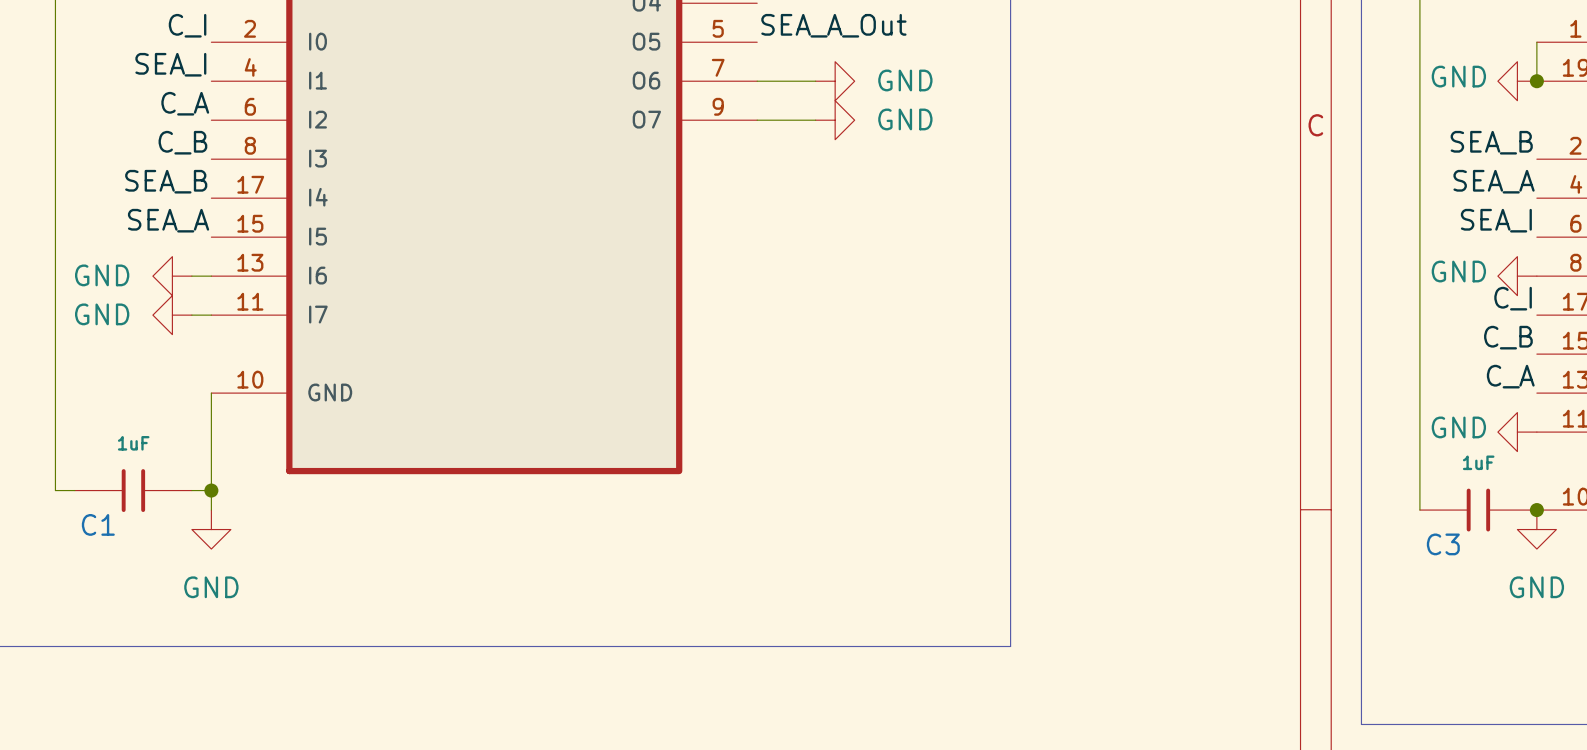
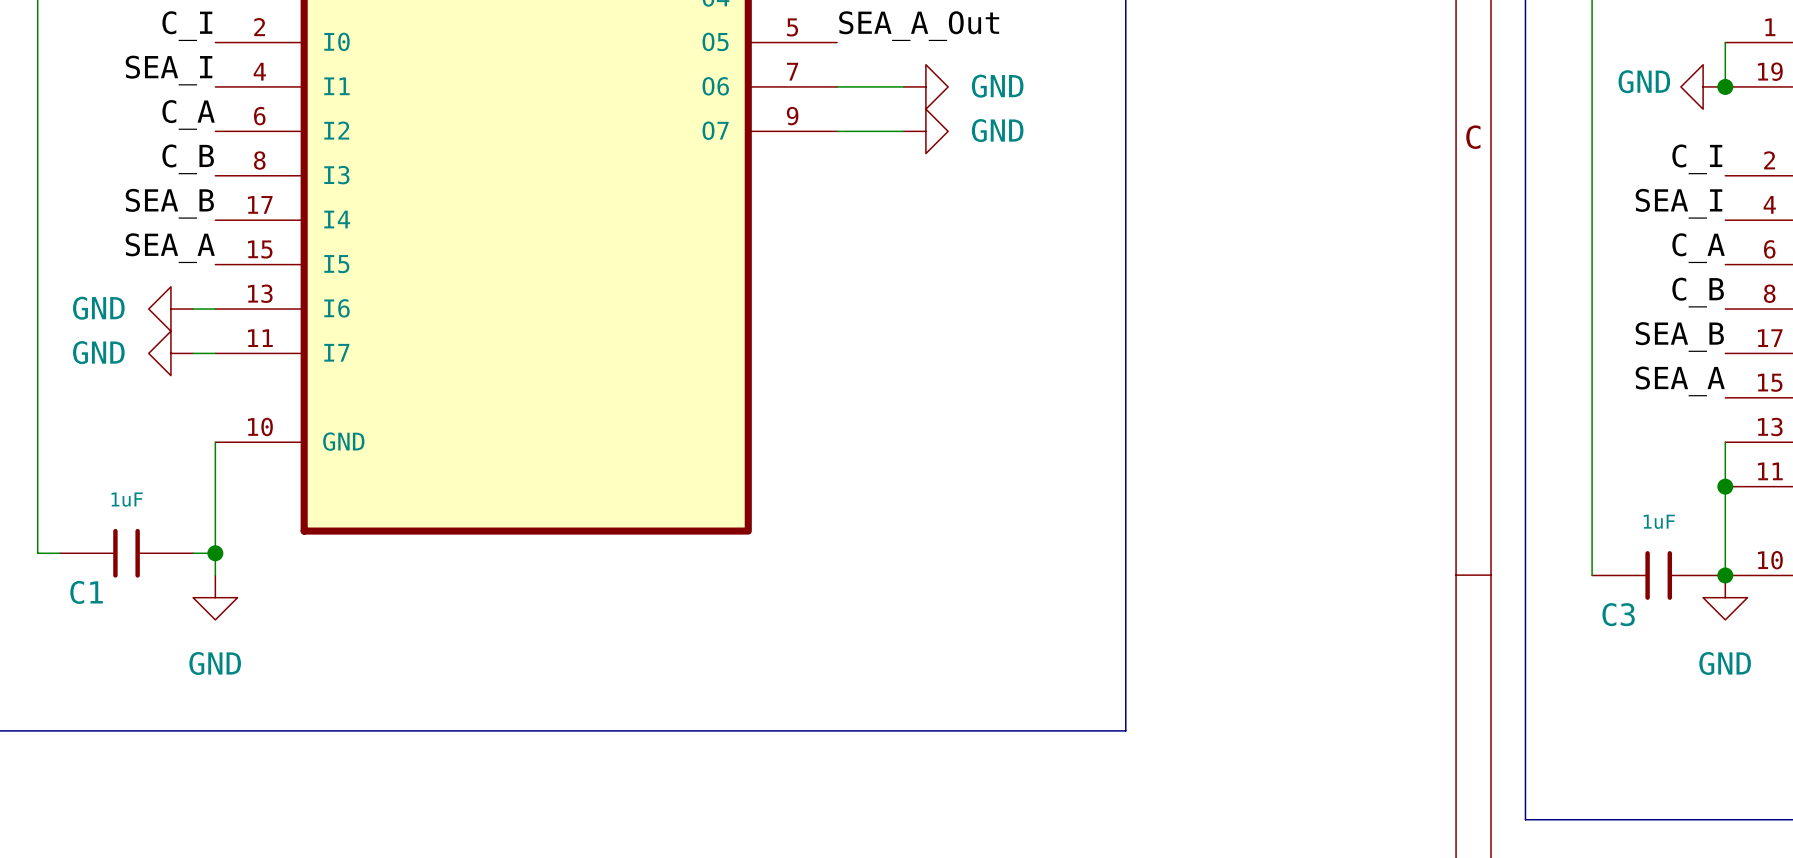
label: SEA_B (1491, 142) -> C_I (1697, 159)
label: SEA_A (1494, 181) -> SEA_I (1678, 203)
label: SEA_I (1496, 220) -> C_A (1698, 248)
label: none -> C_B (1698, 292)
power symbol: GND (1517, 276) -> none
label: C_I (1513, 298) -> SEA_B (1679, 337)
label: C_B (1508, 337) -> SEA_A (1680, 381)
label: C_A (1510, 376) -> none
wire: none -> (1725, 442) (1725, 575)
power symbol: GND (1517, 432) -> none
junction: none -> (1725, 486)

